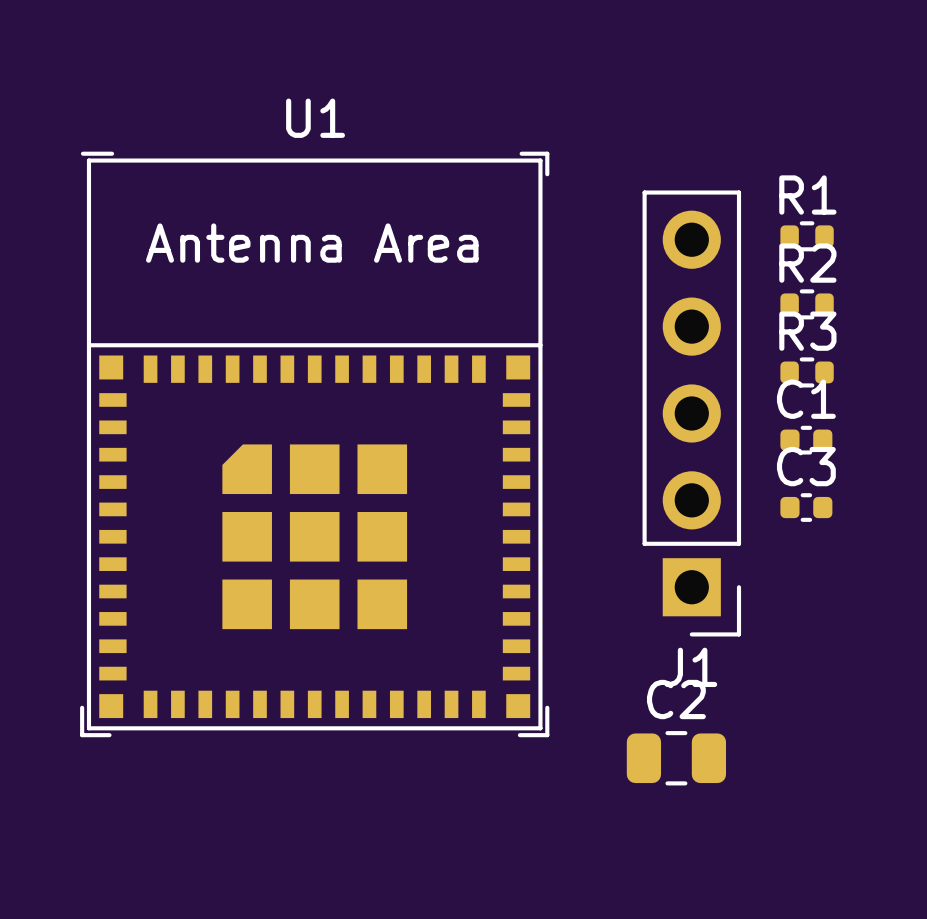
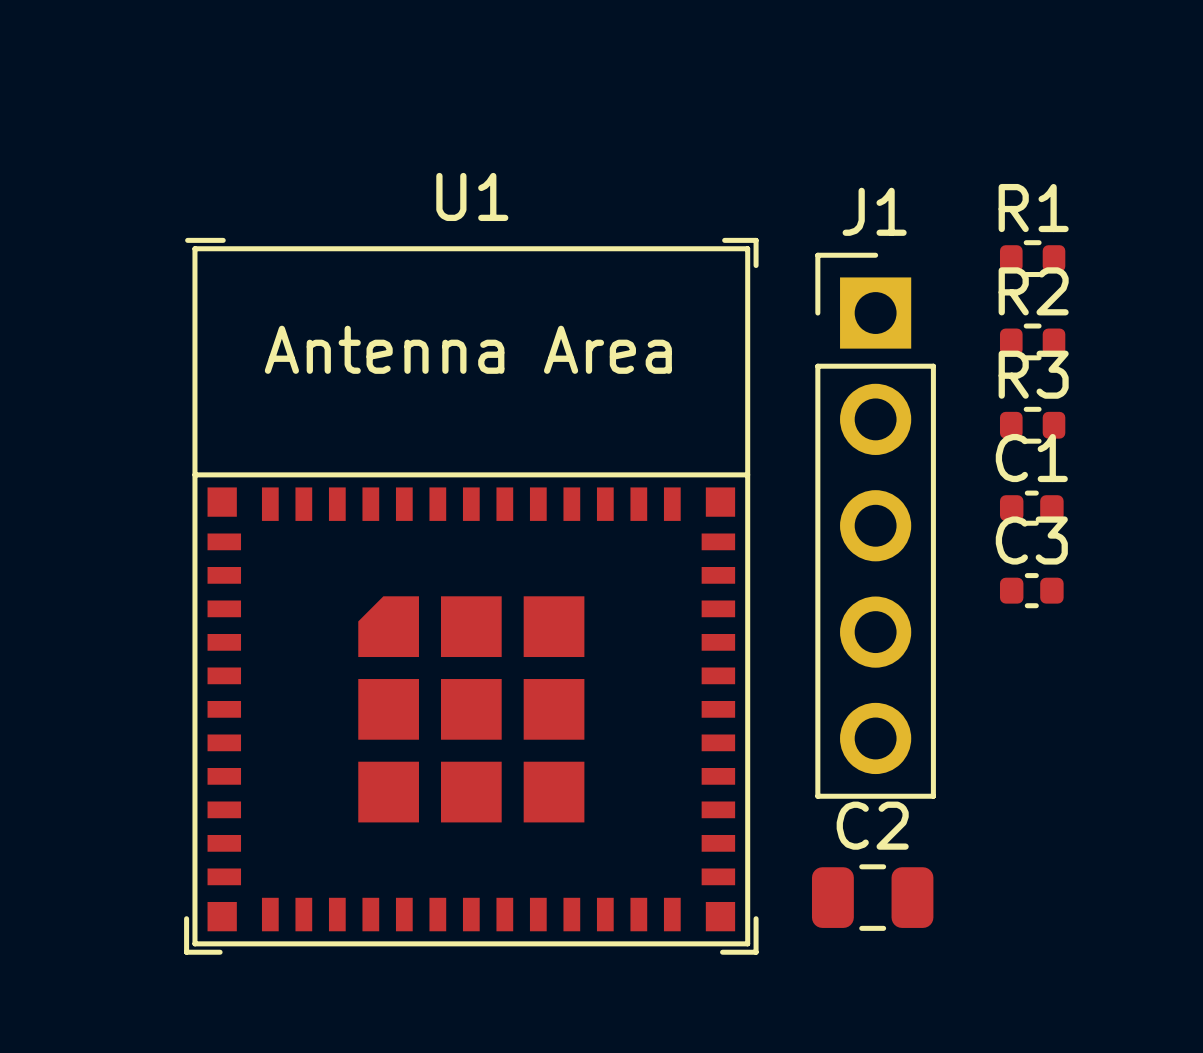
J1 rotation: 0° (691, 413) -> 180° (875, 525)
U1 position: (314, 444) -> (471, 596)

